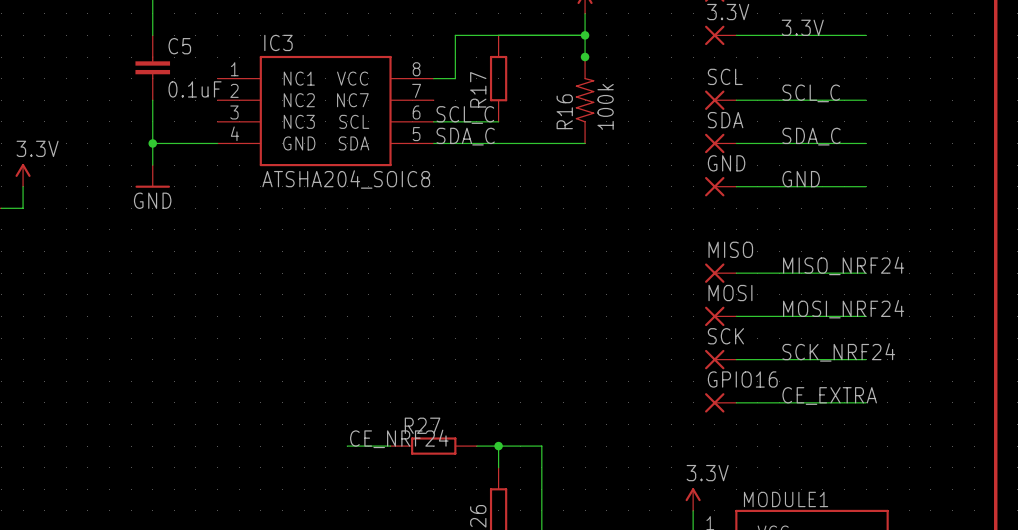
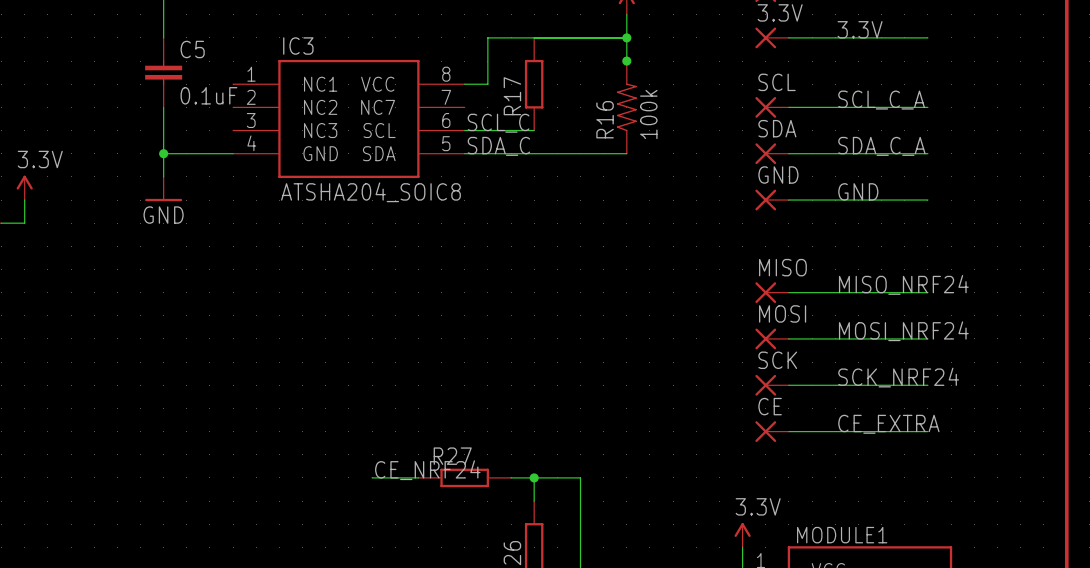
label: SCL_C (811, 93) -> SCL_C_A (881, 100)
label: SDA_C (811, 136) -> SDA_C_A (881, 146)
GPIO16 name: GPIO16 (742, 379) -> CE (770, 406)

